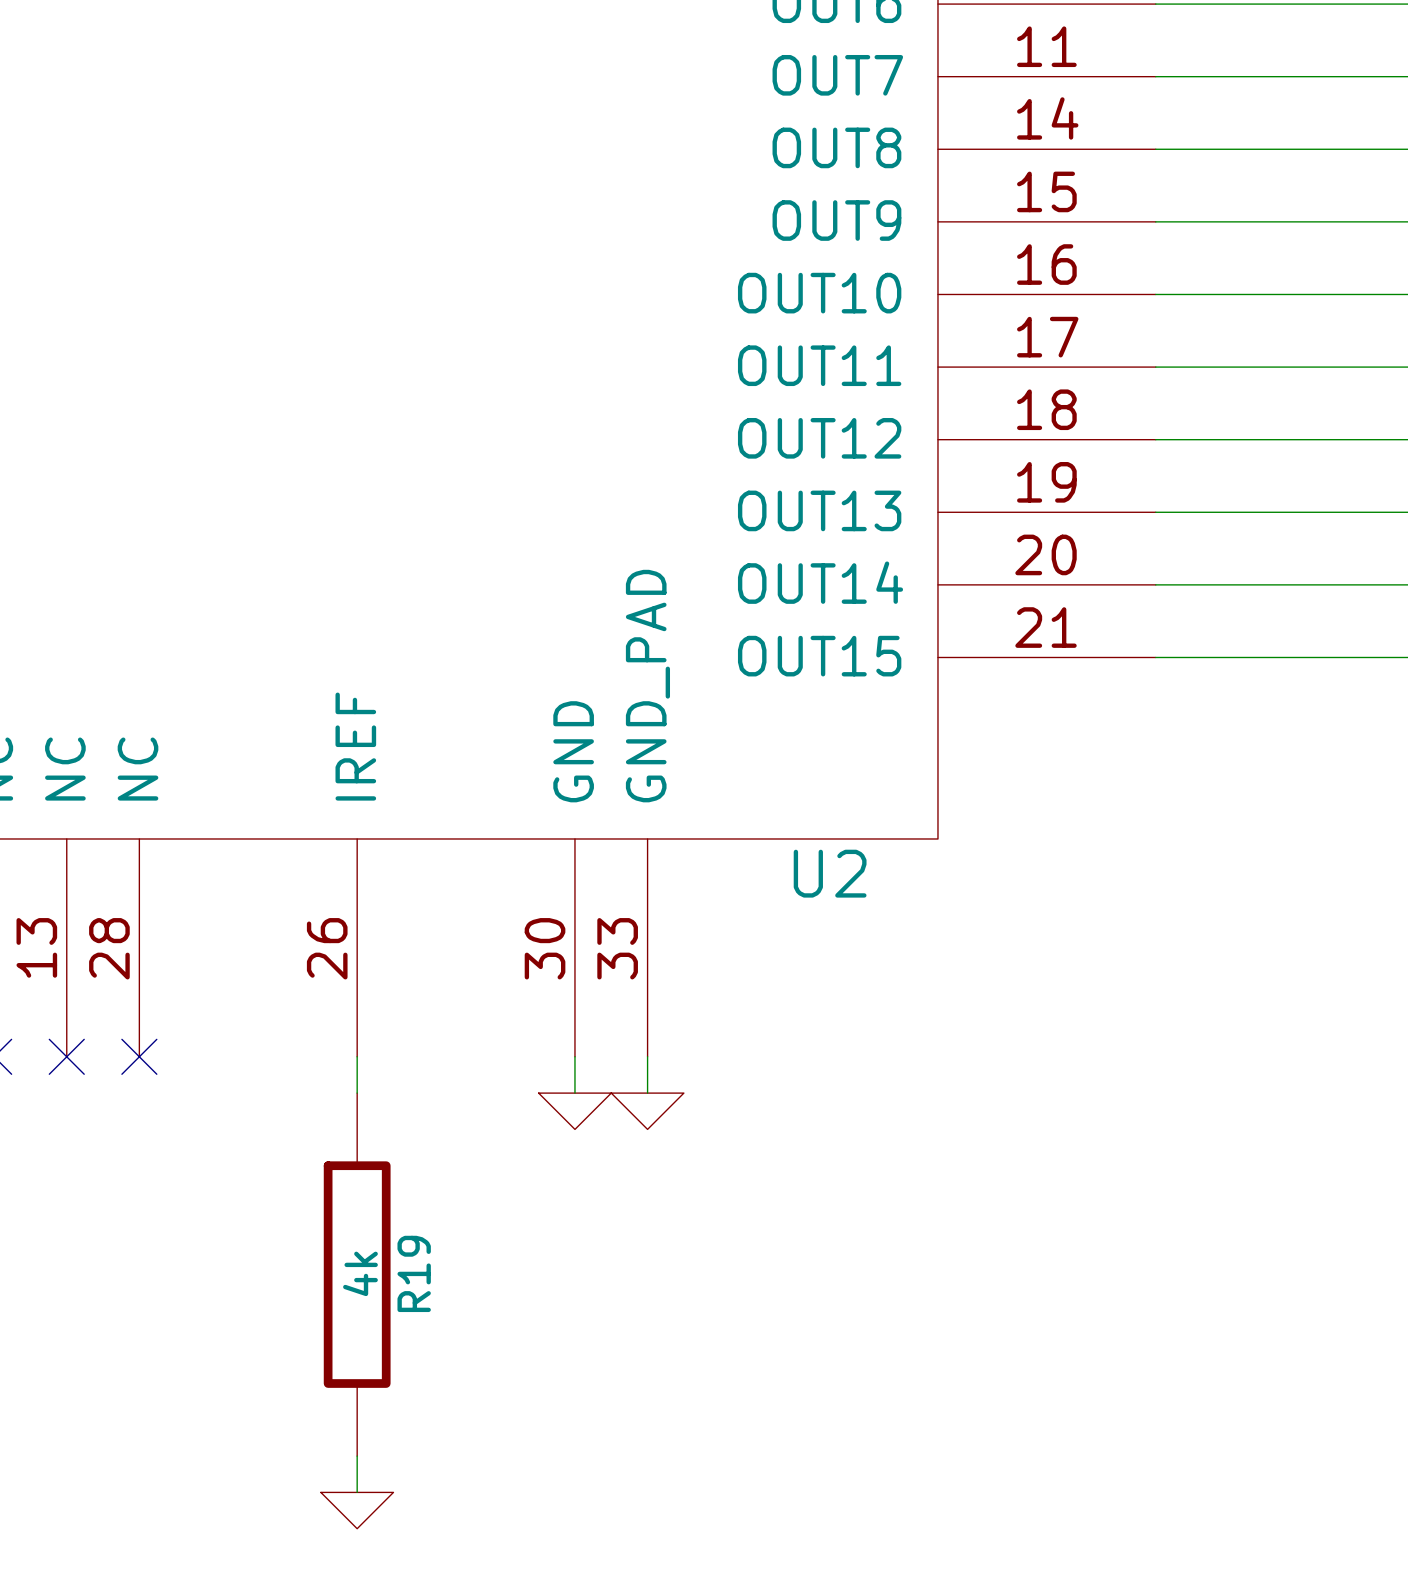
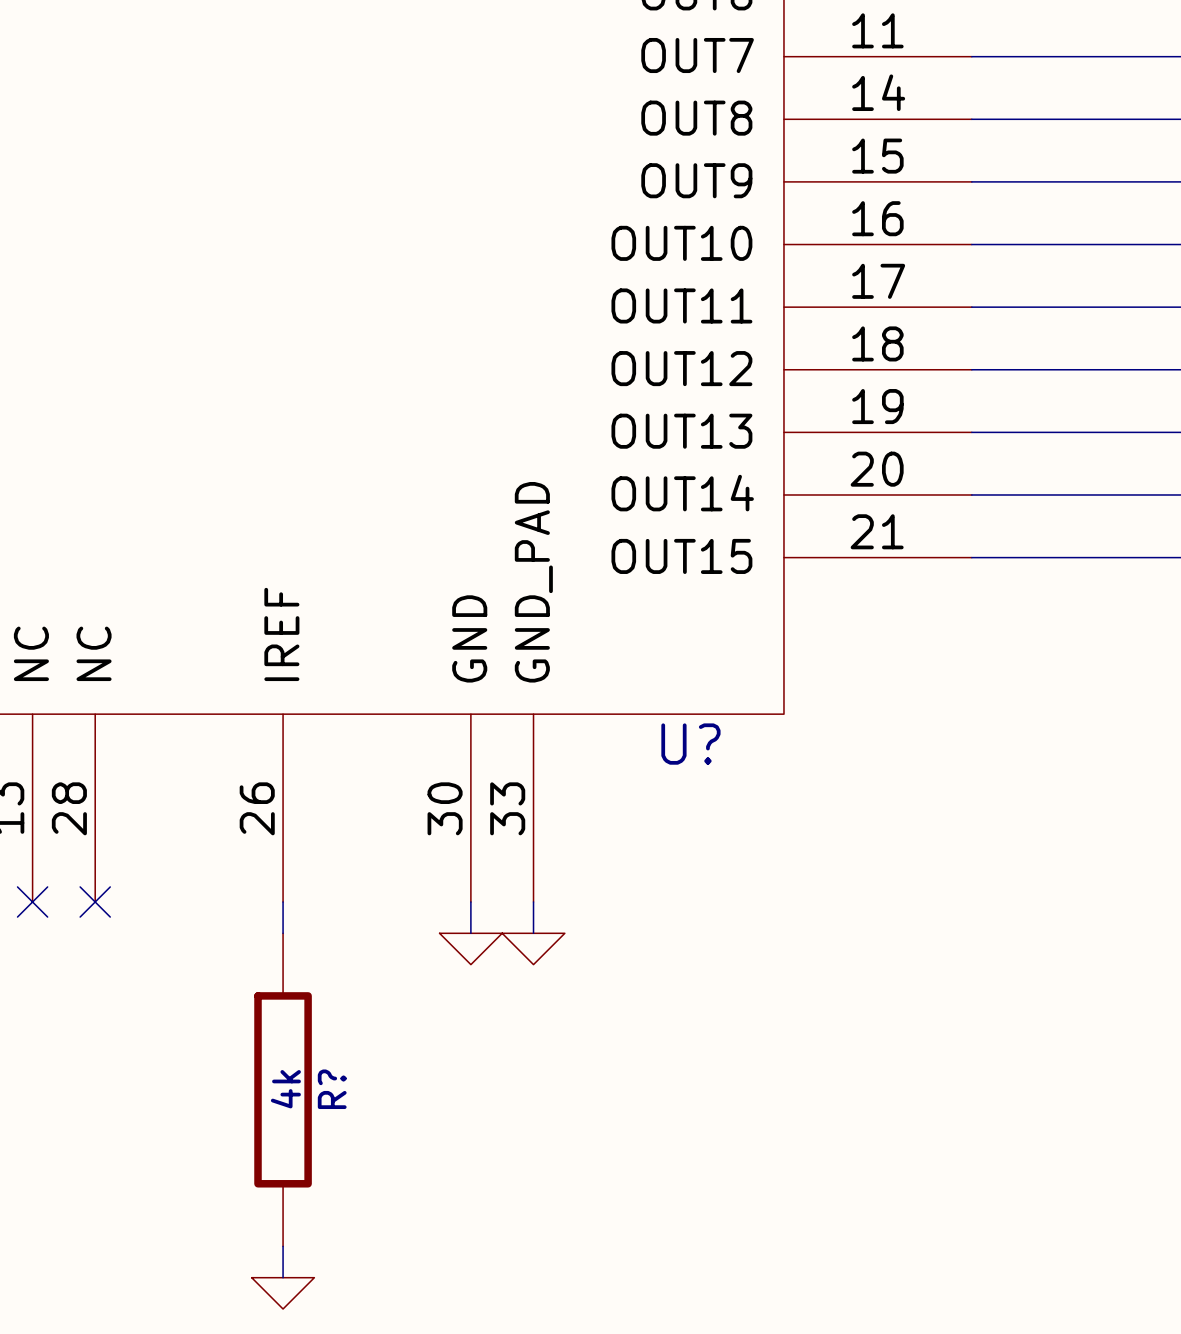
U2 name: U2 (830, 873) -> U? (690, 744)
R19 name: R19 (414, 1273) -> R? (332, 1089)

